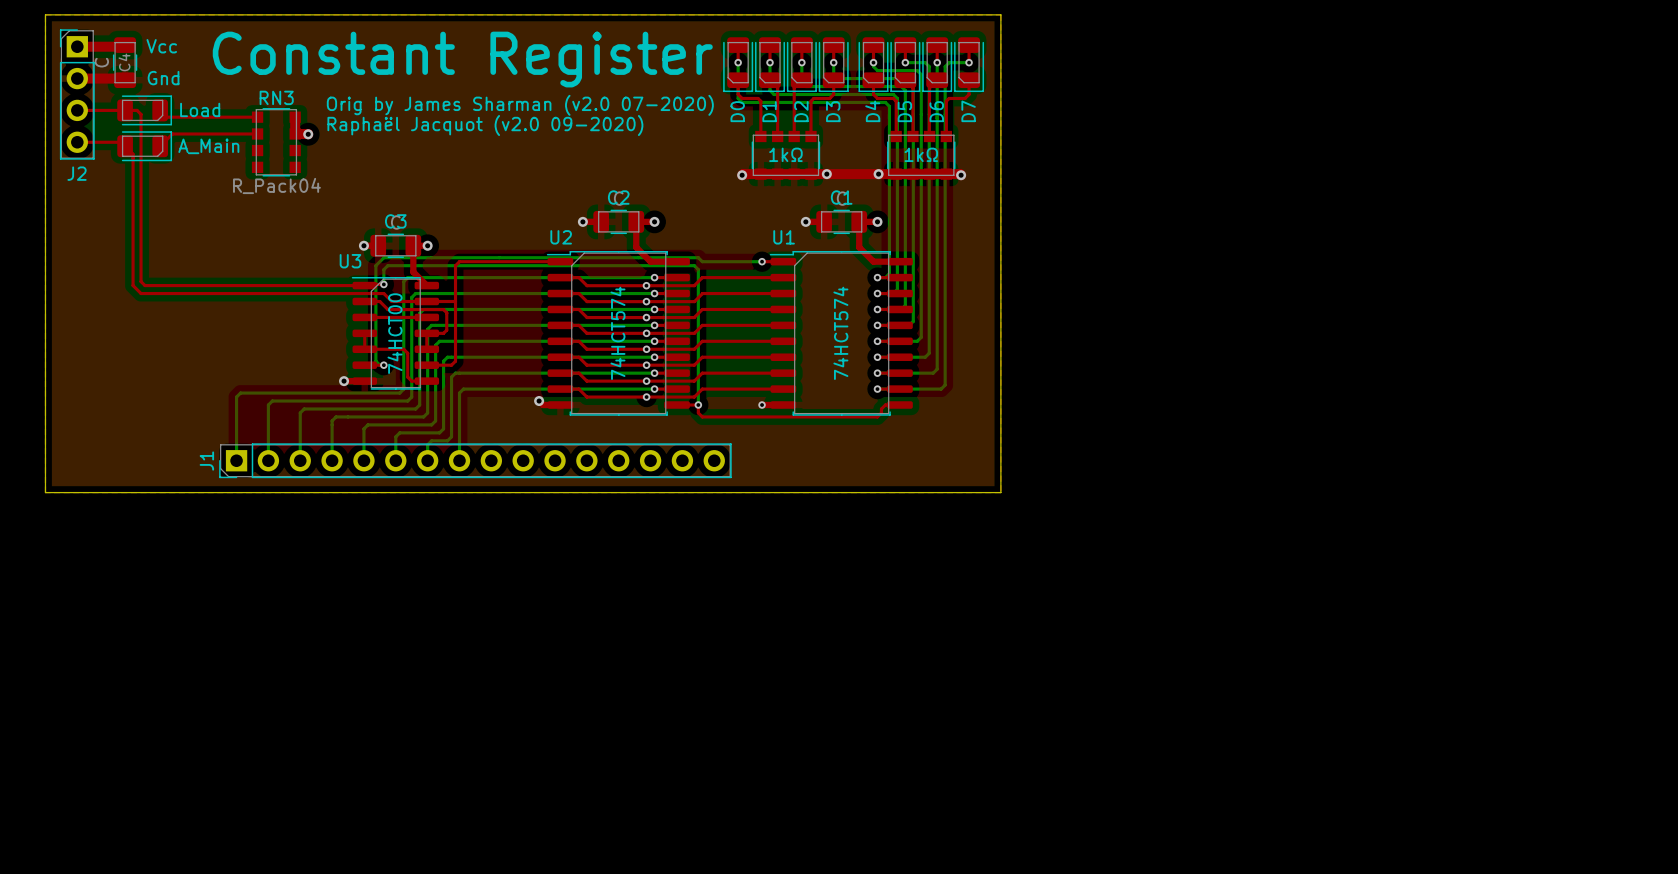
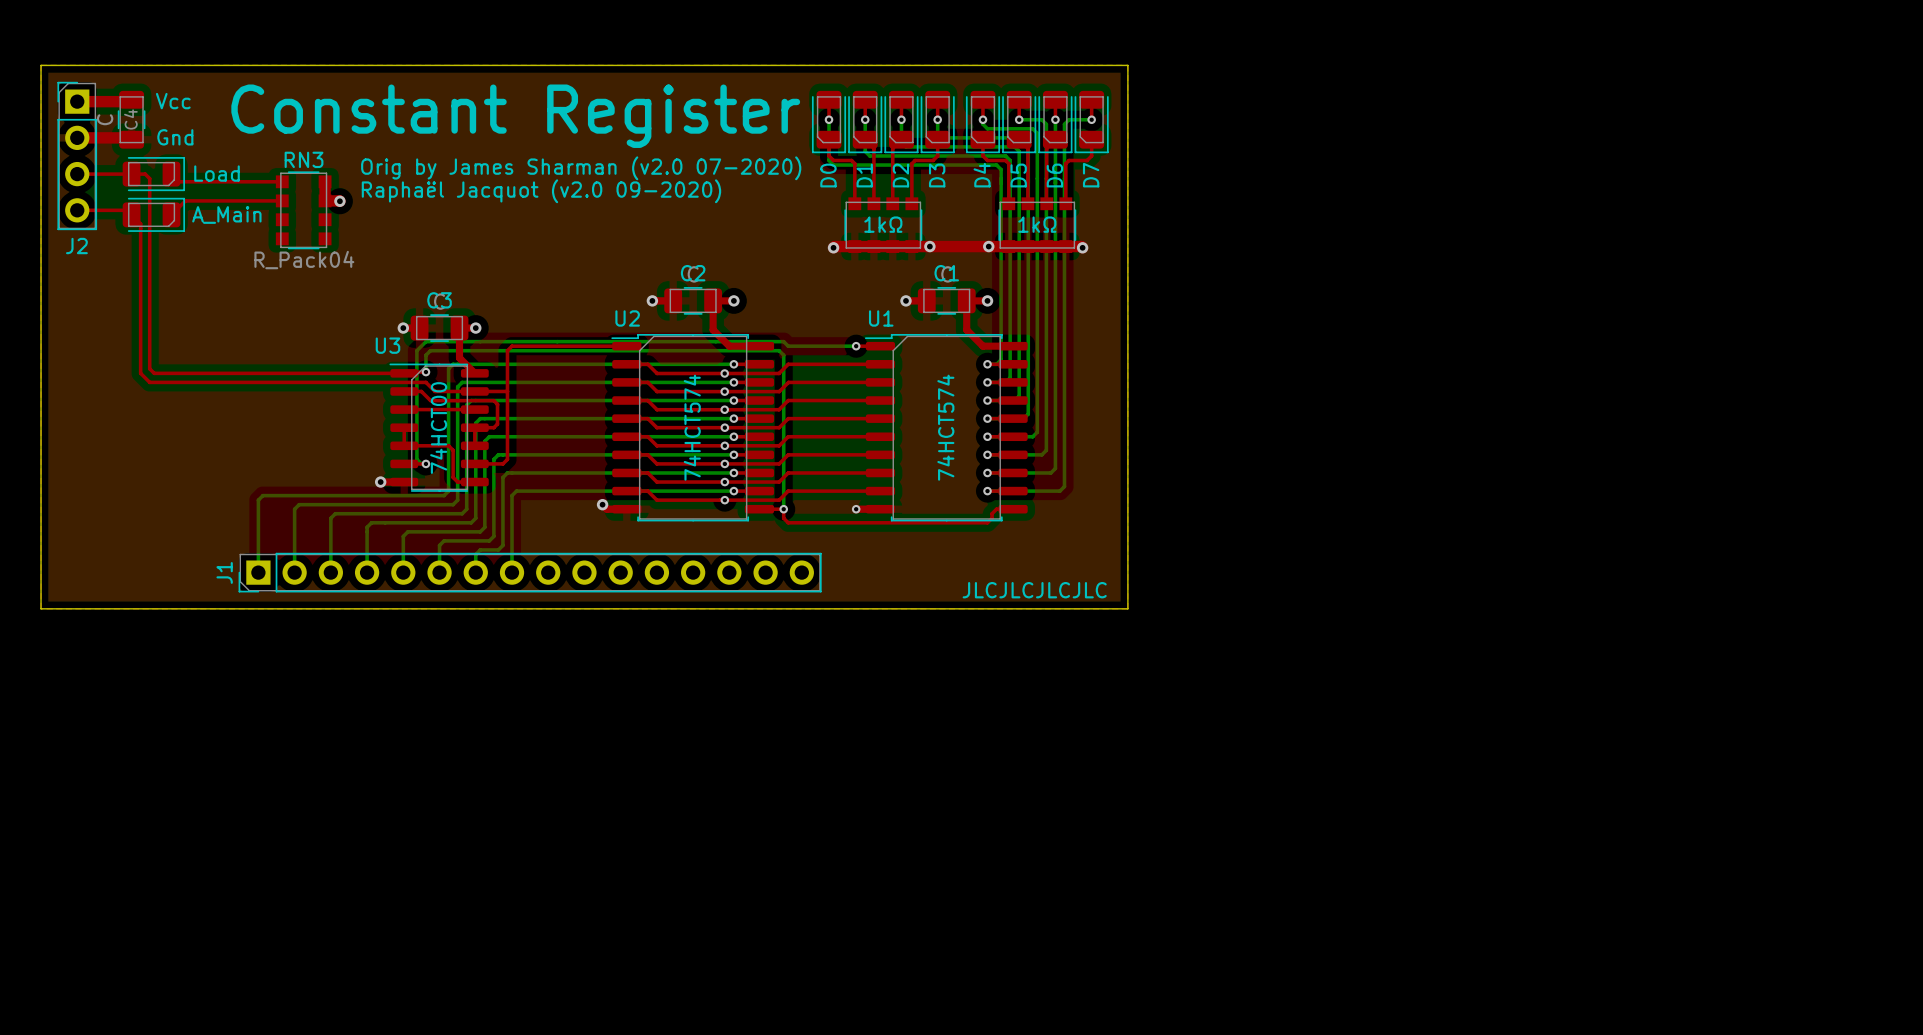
text: none -> JLCJLCJLCJLC (1034, 590)

